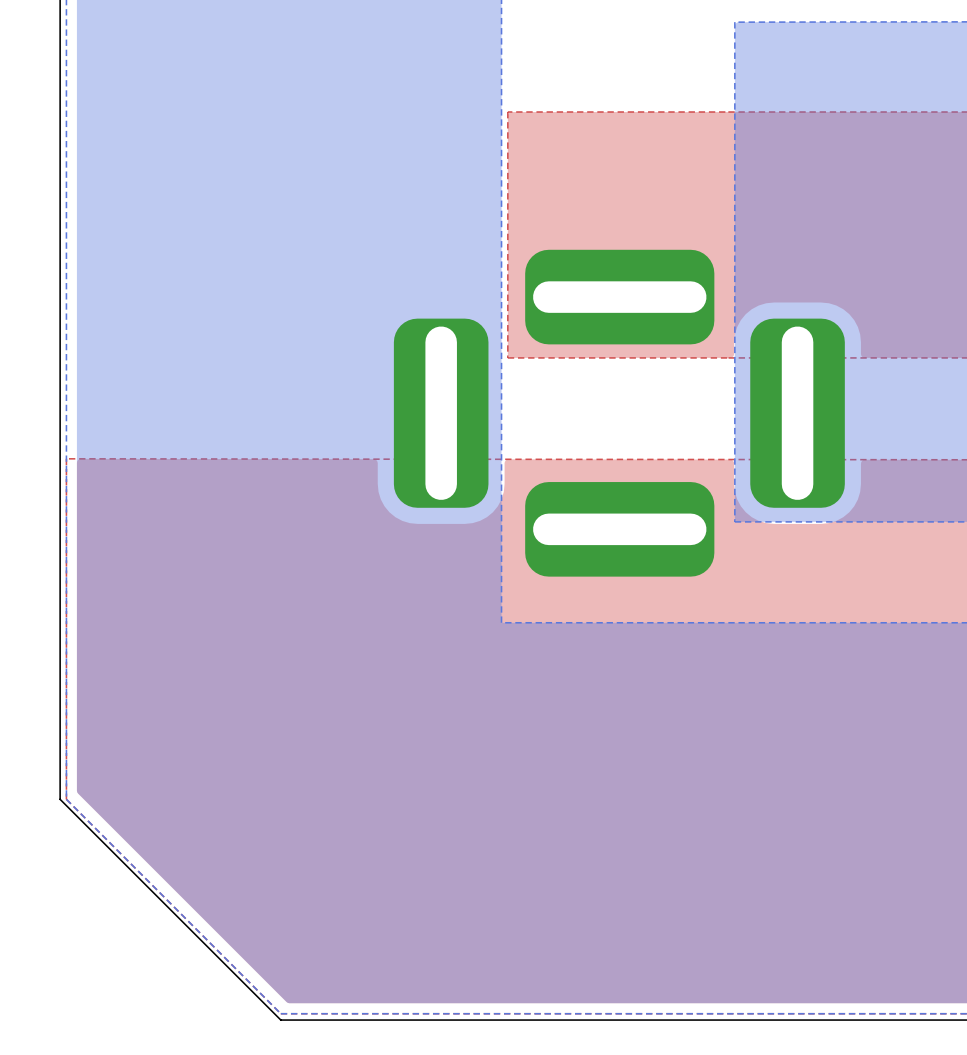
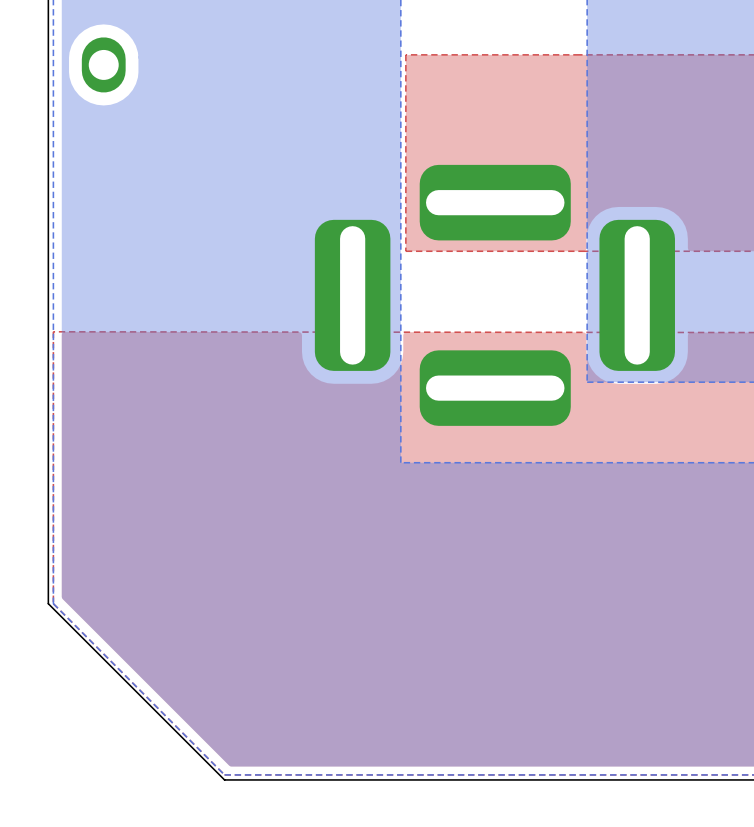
part: none -> (103, 64)

